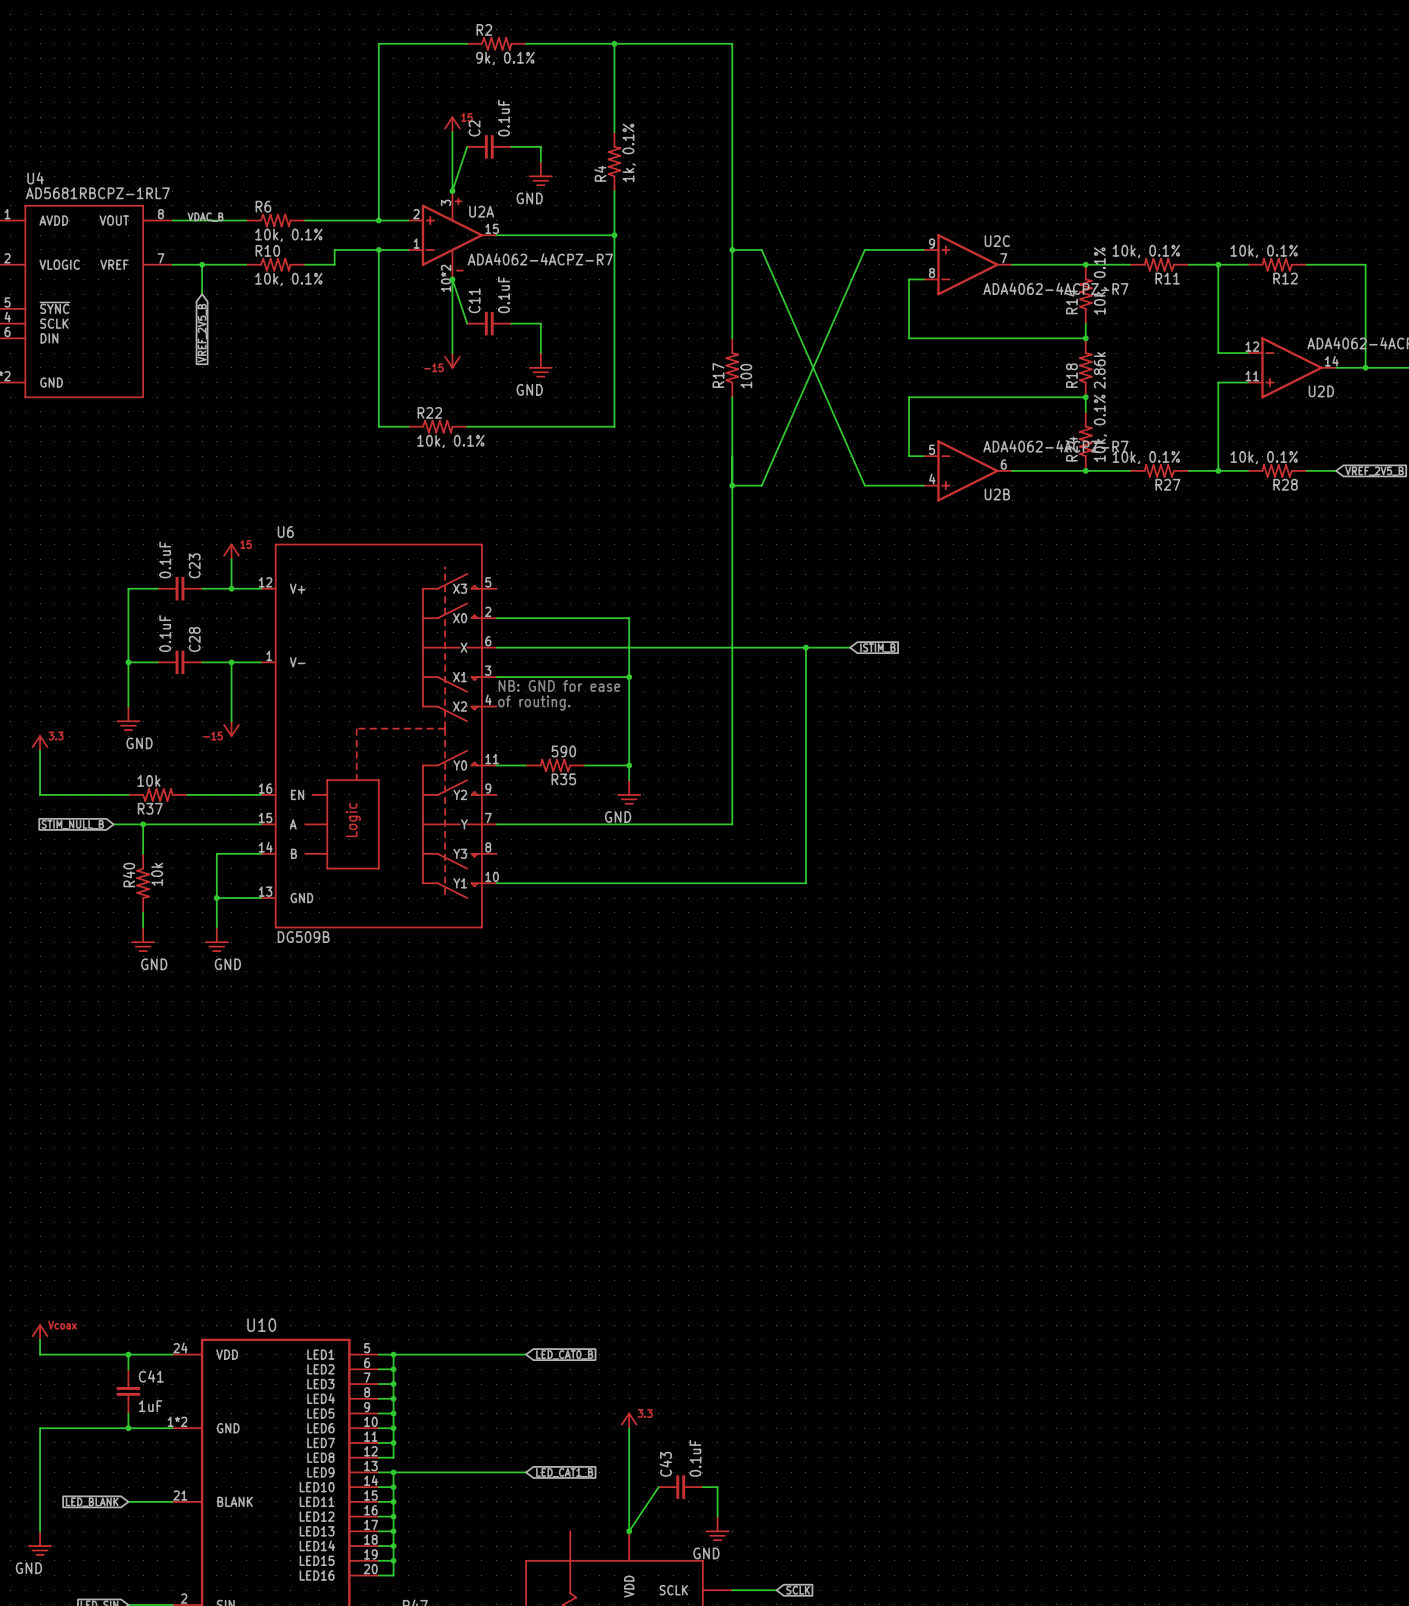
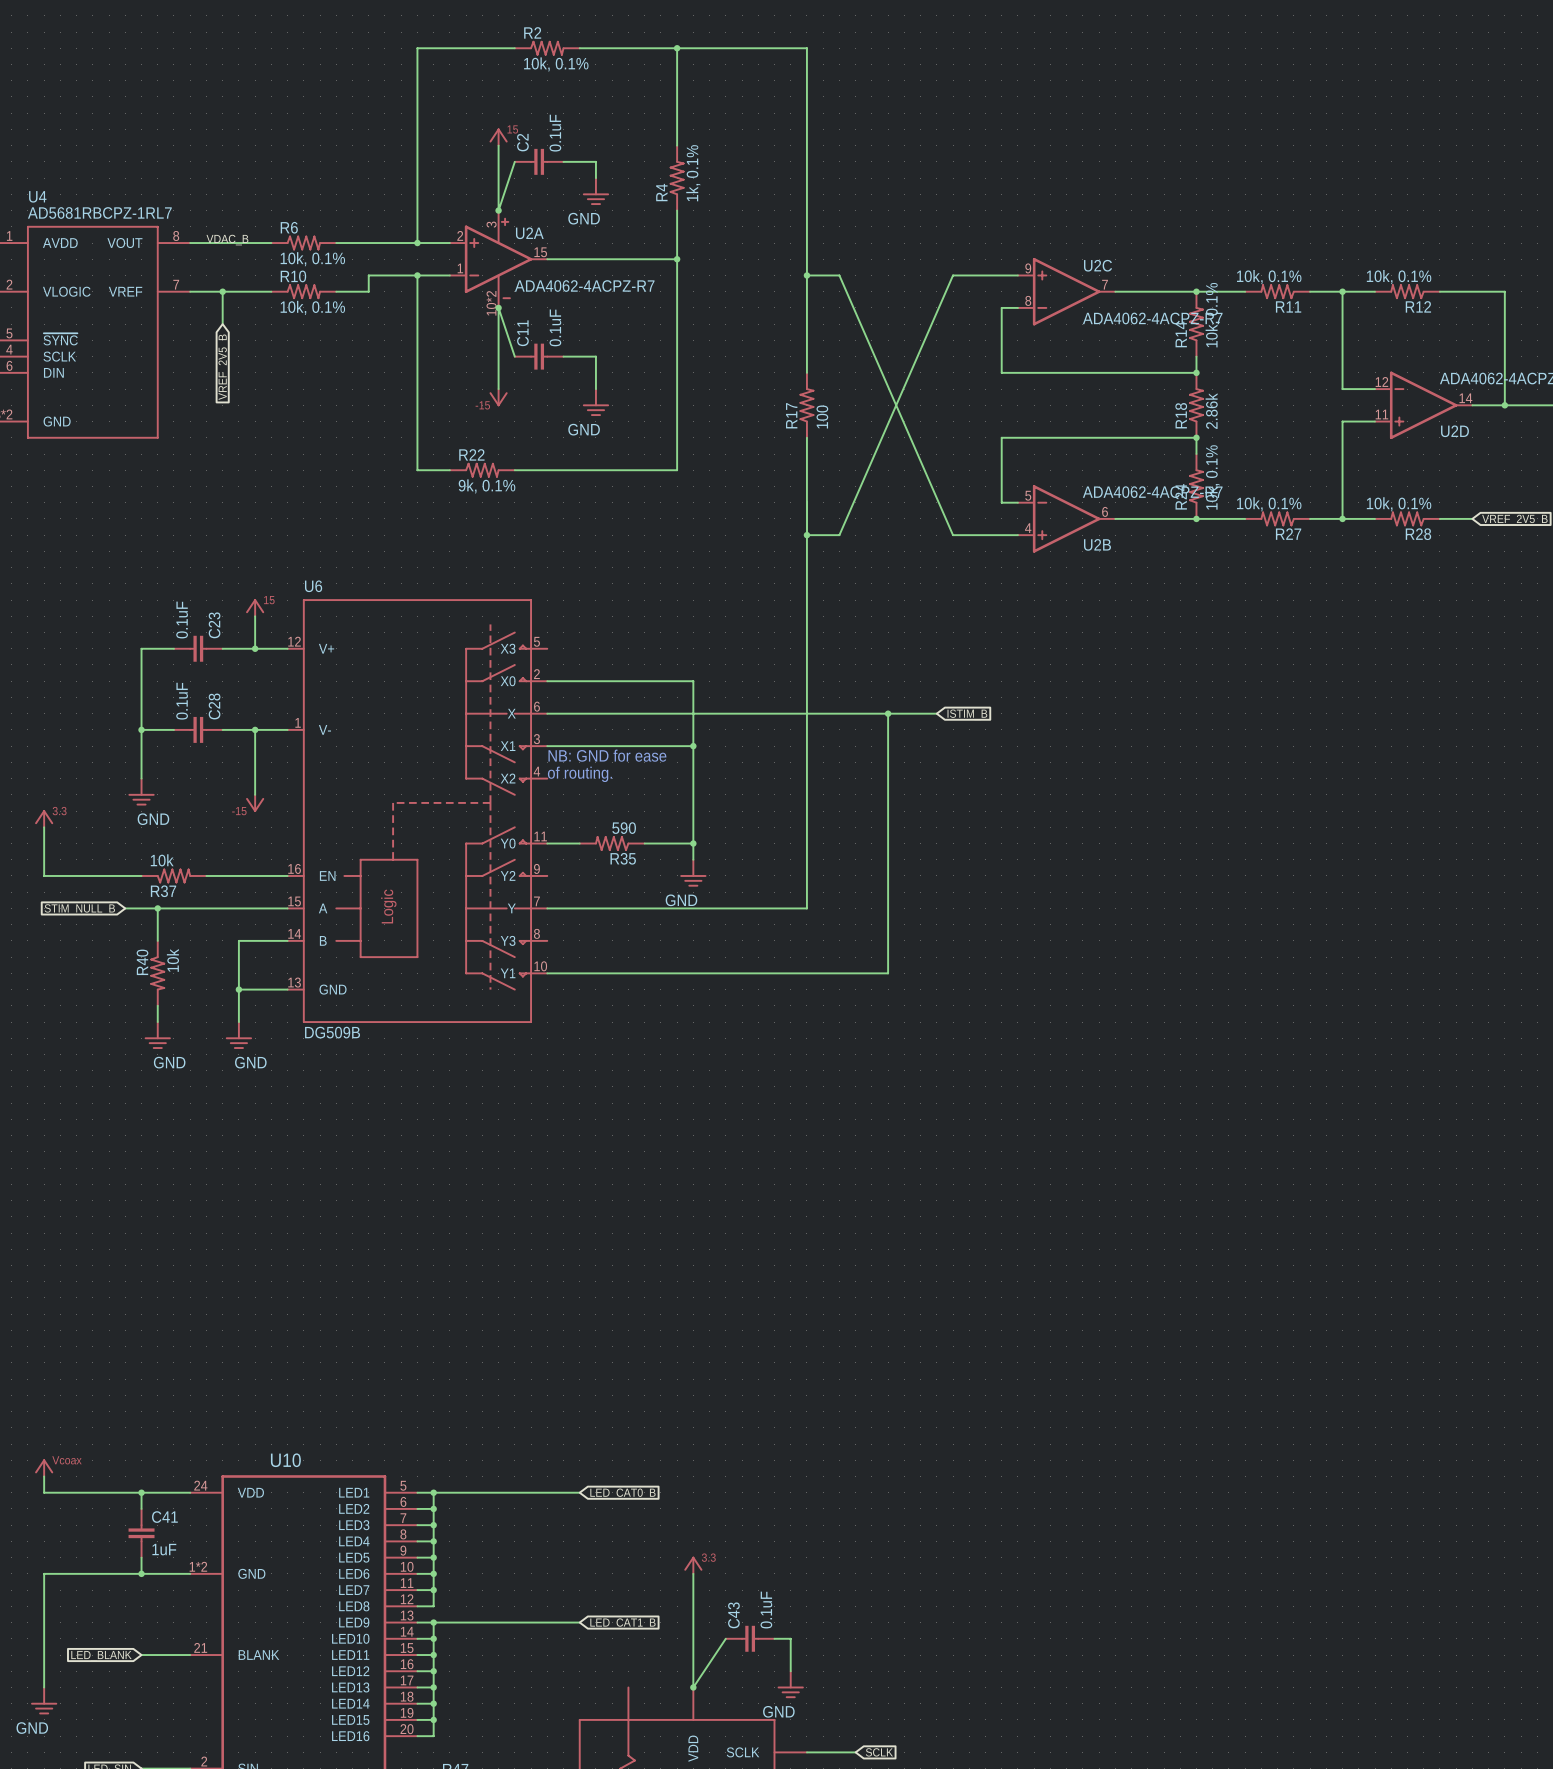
R2 value: 9k, 0.1% (505, 58) -> 10k, 0.1% (556, 64)
R22 value: 10k, 0.1% (450, 441) -> 9k, 0.1% (487, 486)

